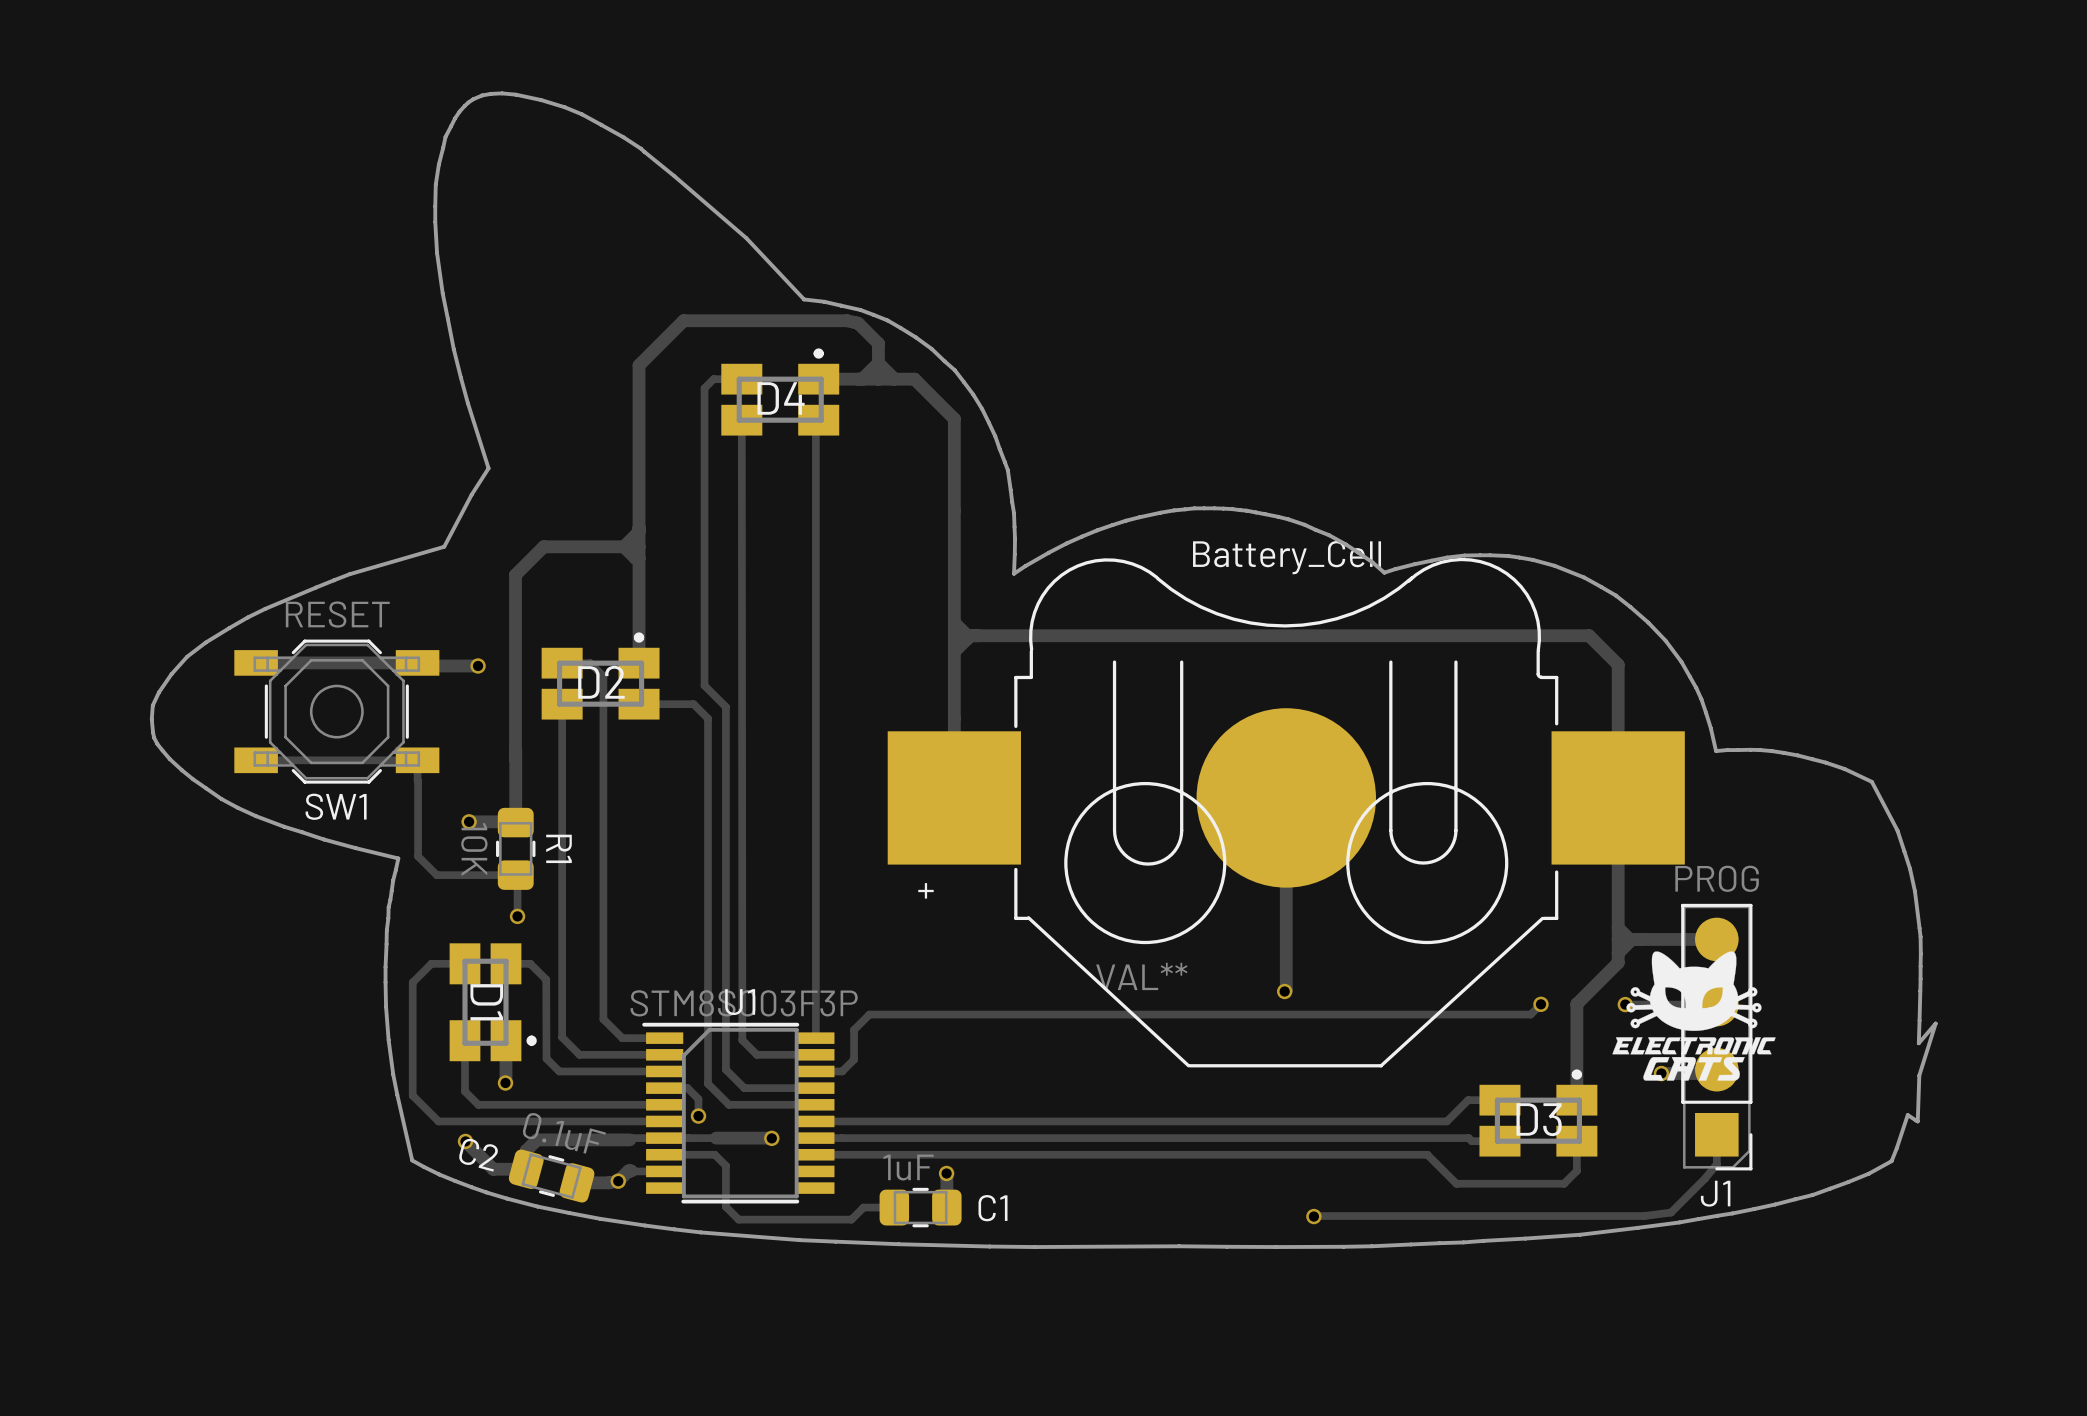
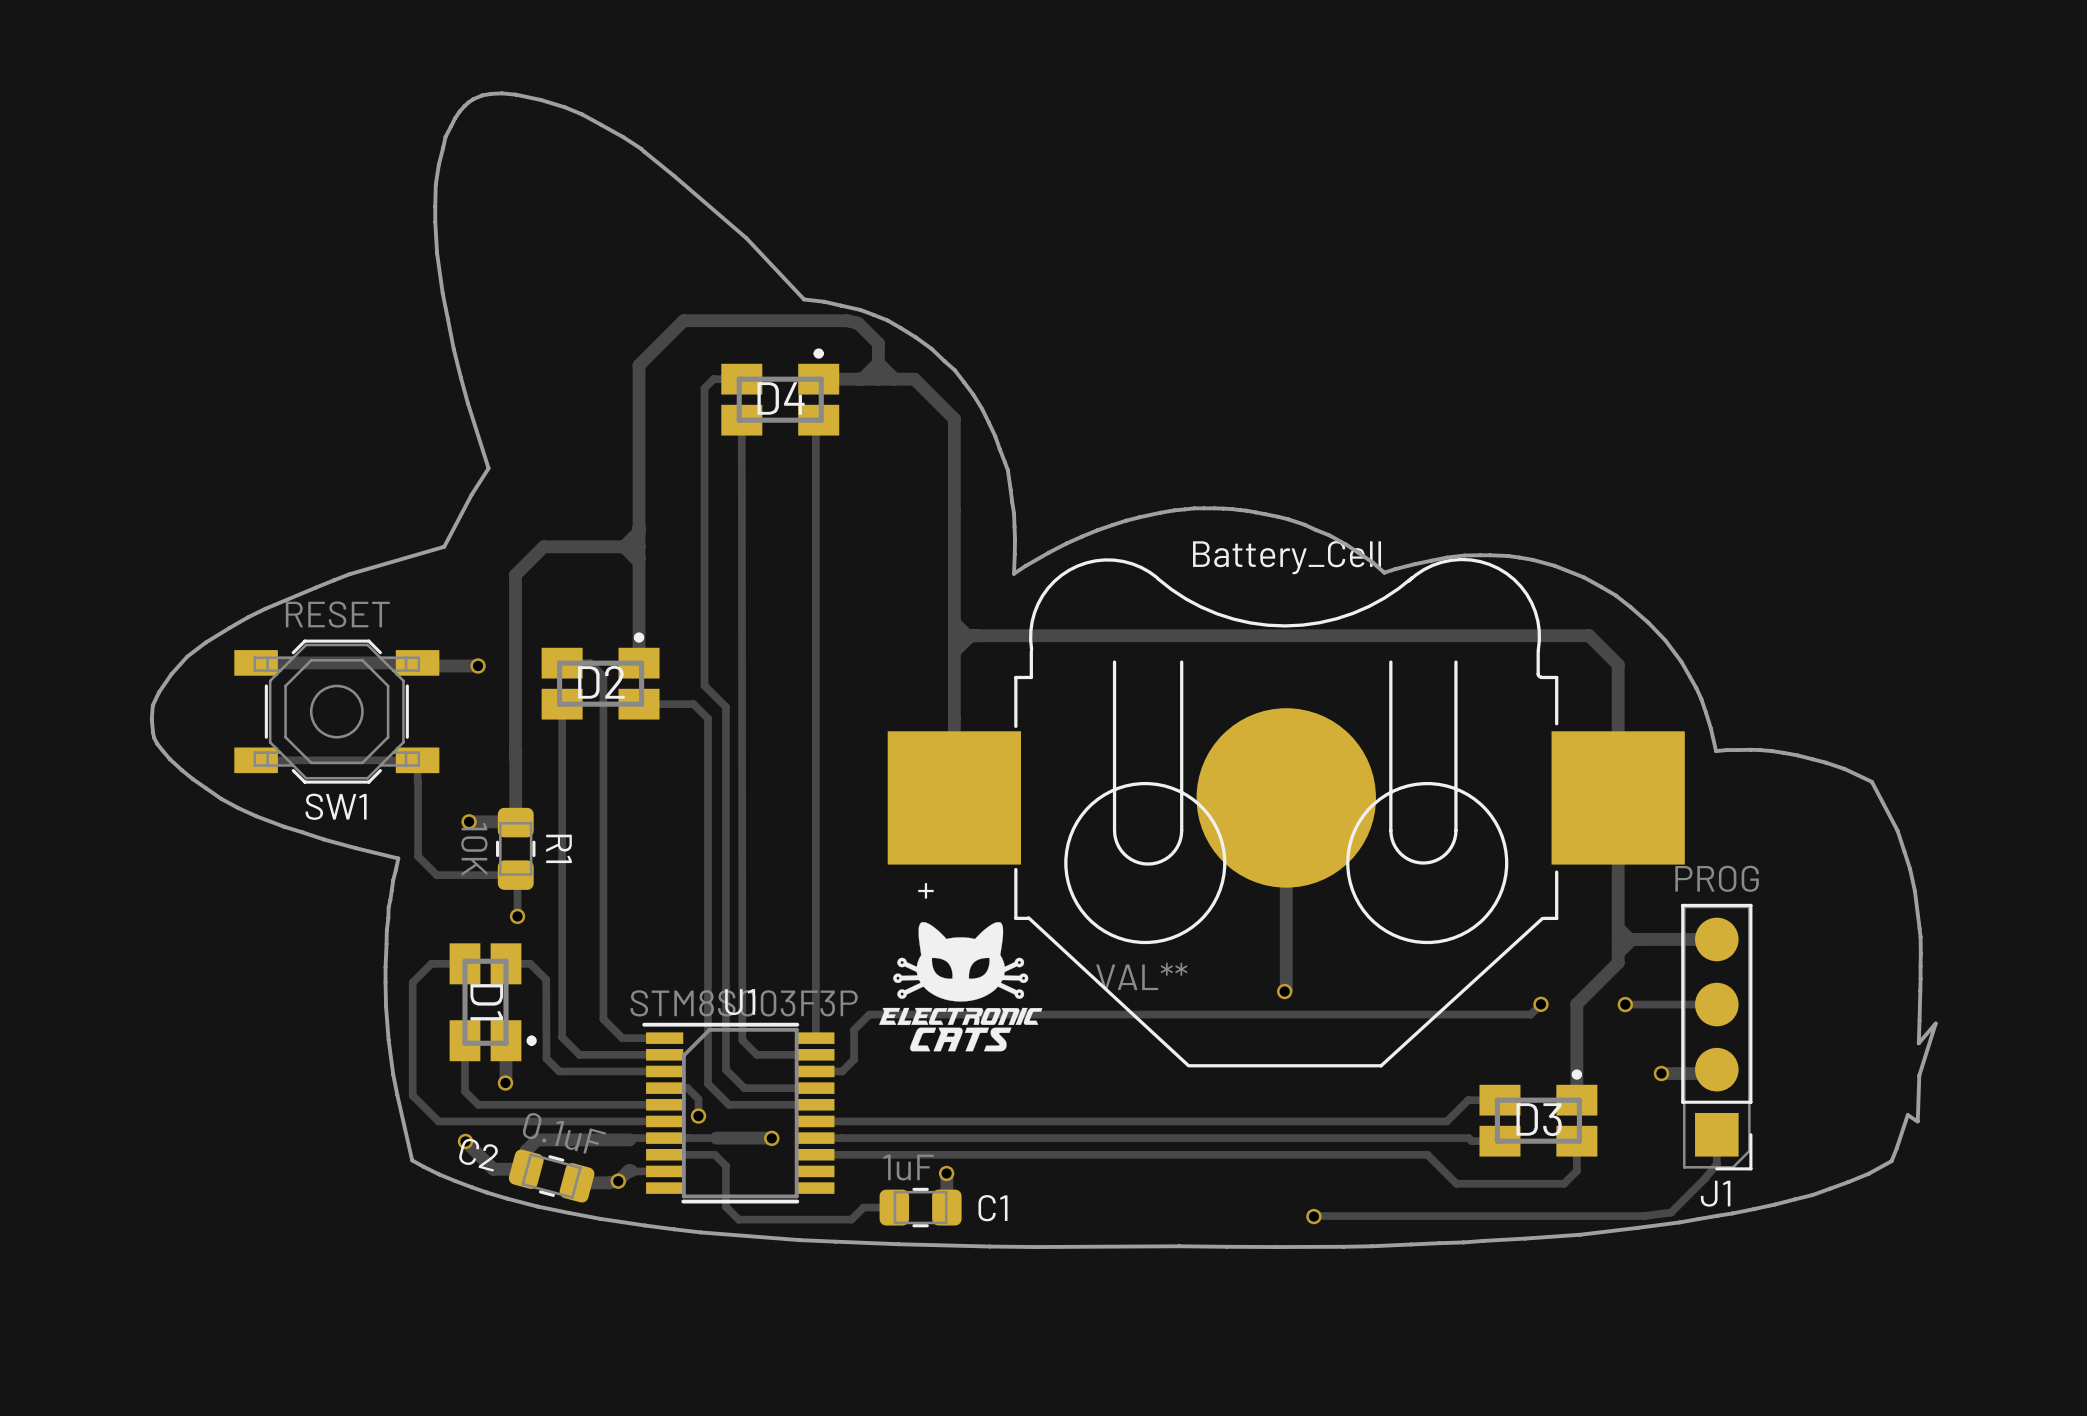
drawing: none -> [879, 922, 1043, 1052]
drawing: [1612, 951, 1776, 1081] -> none

